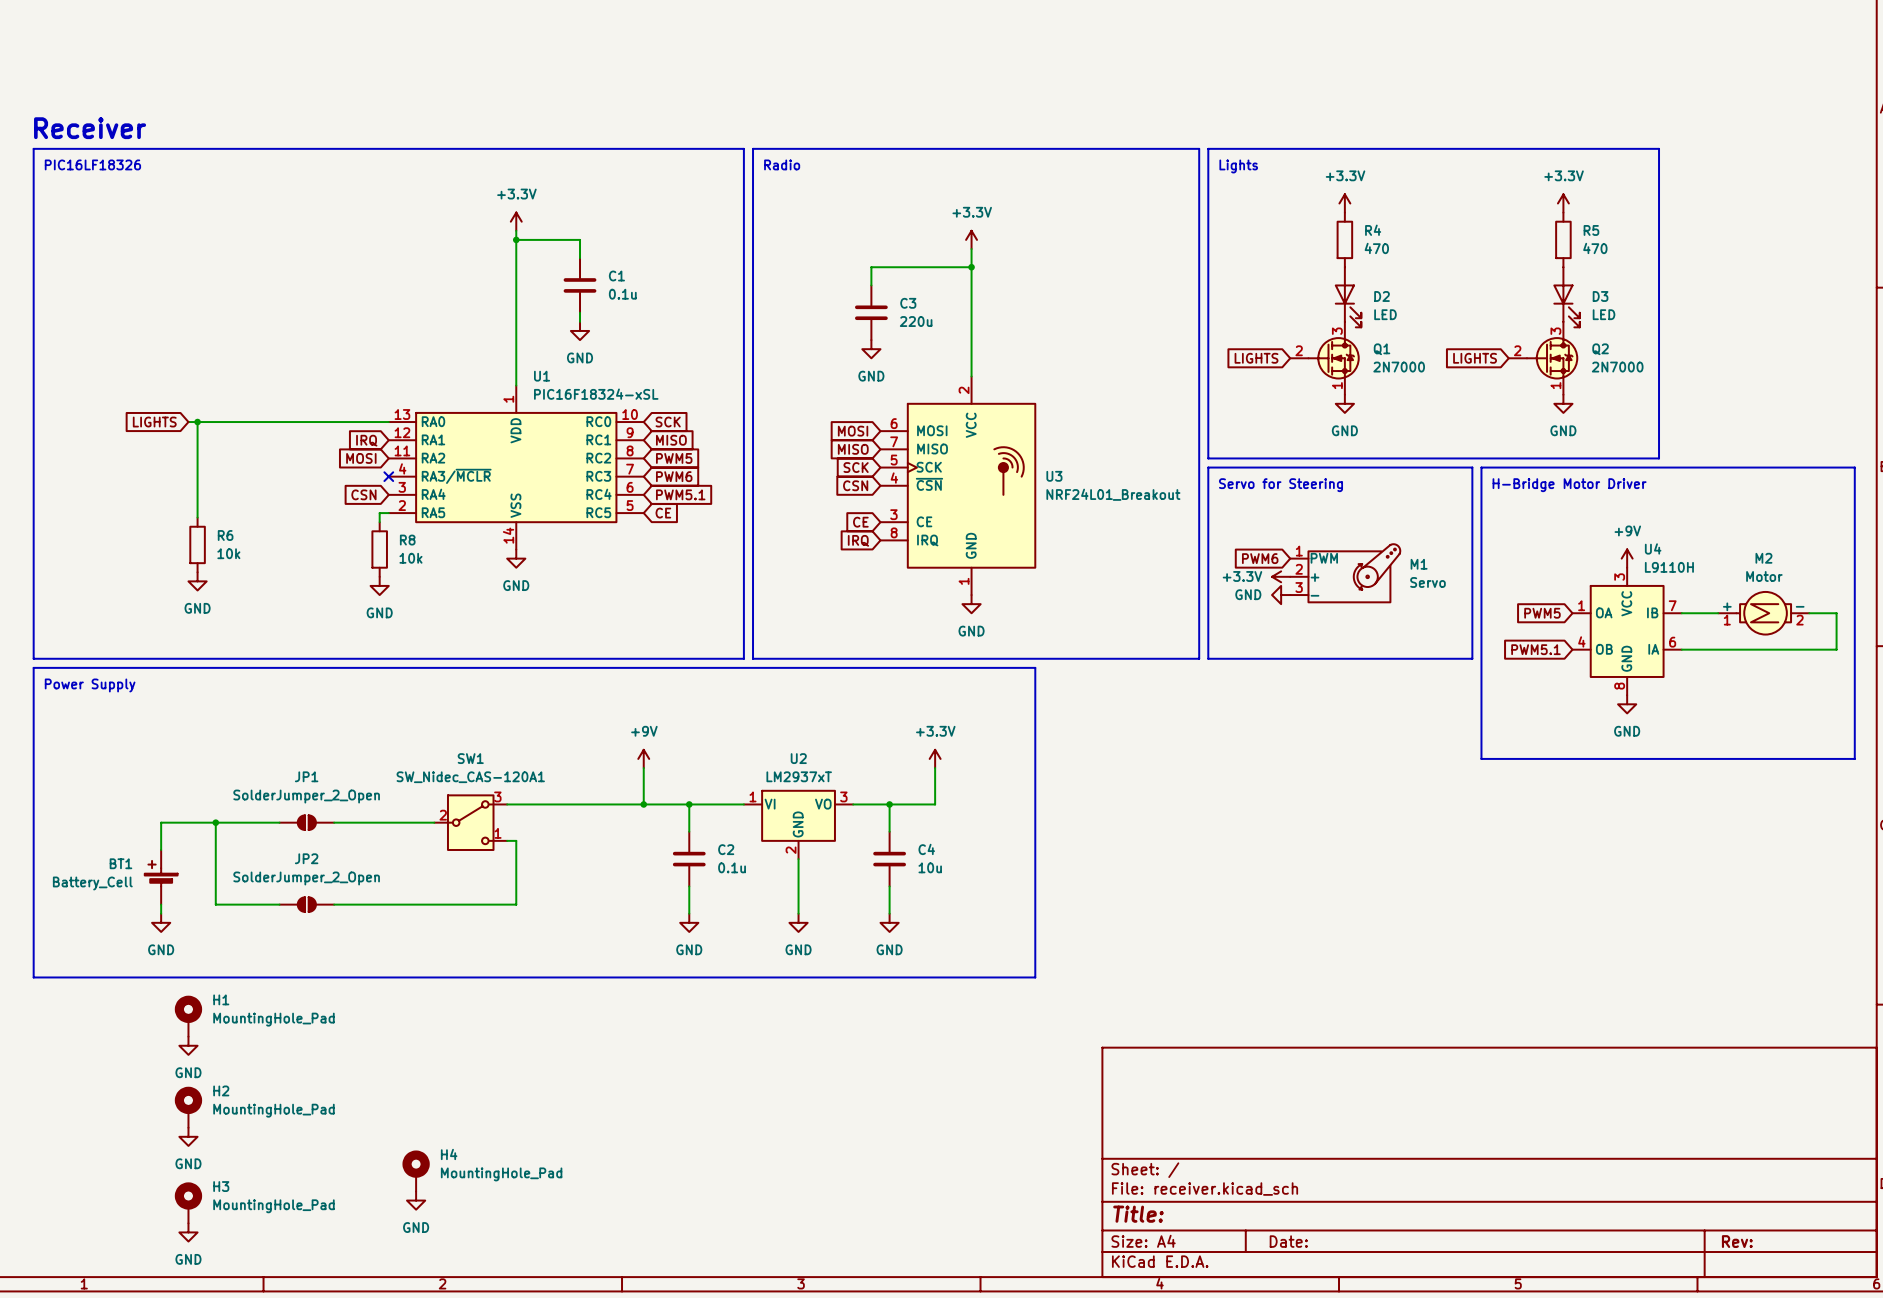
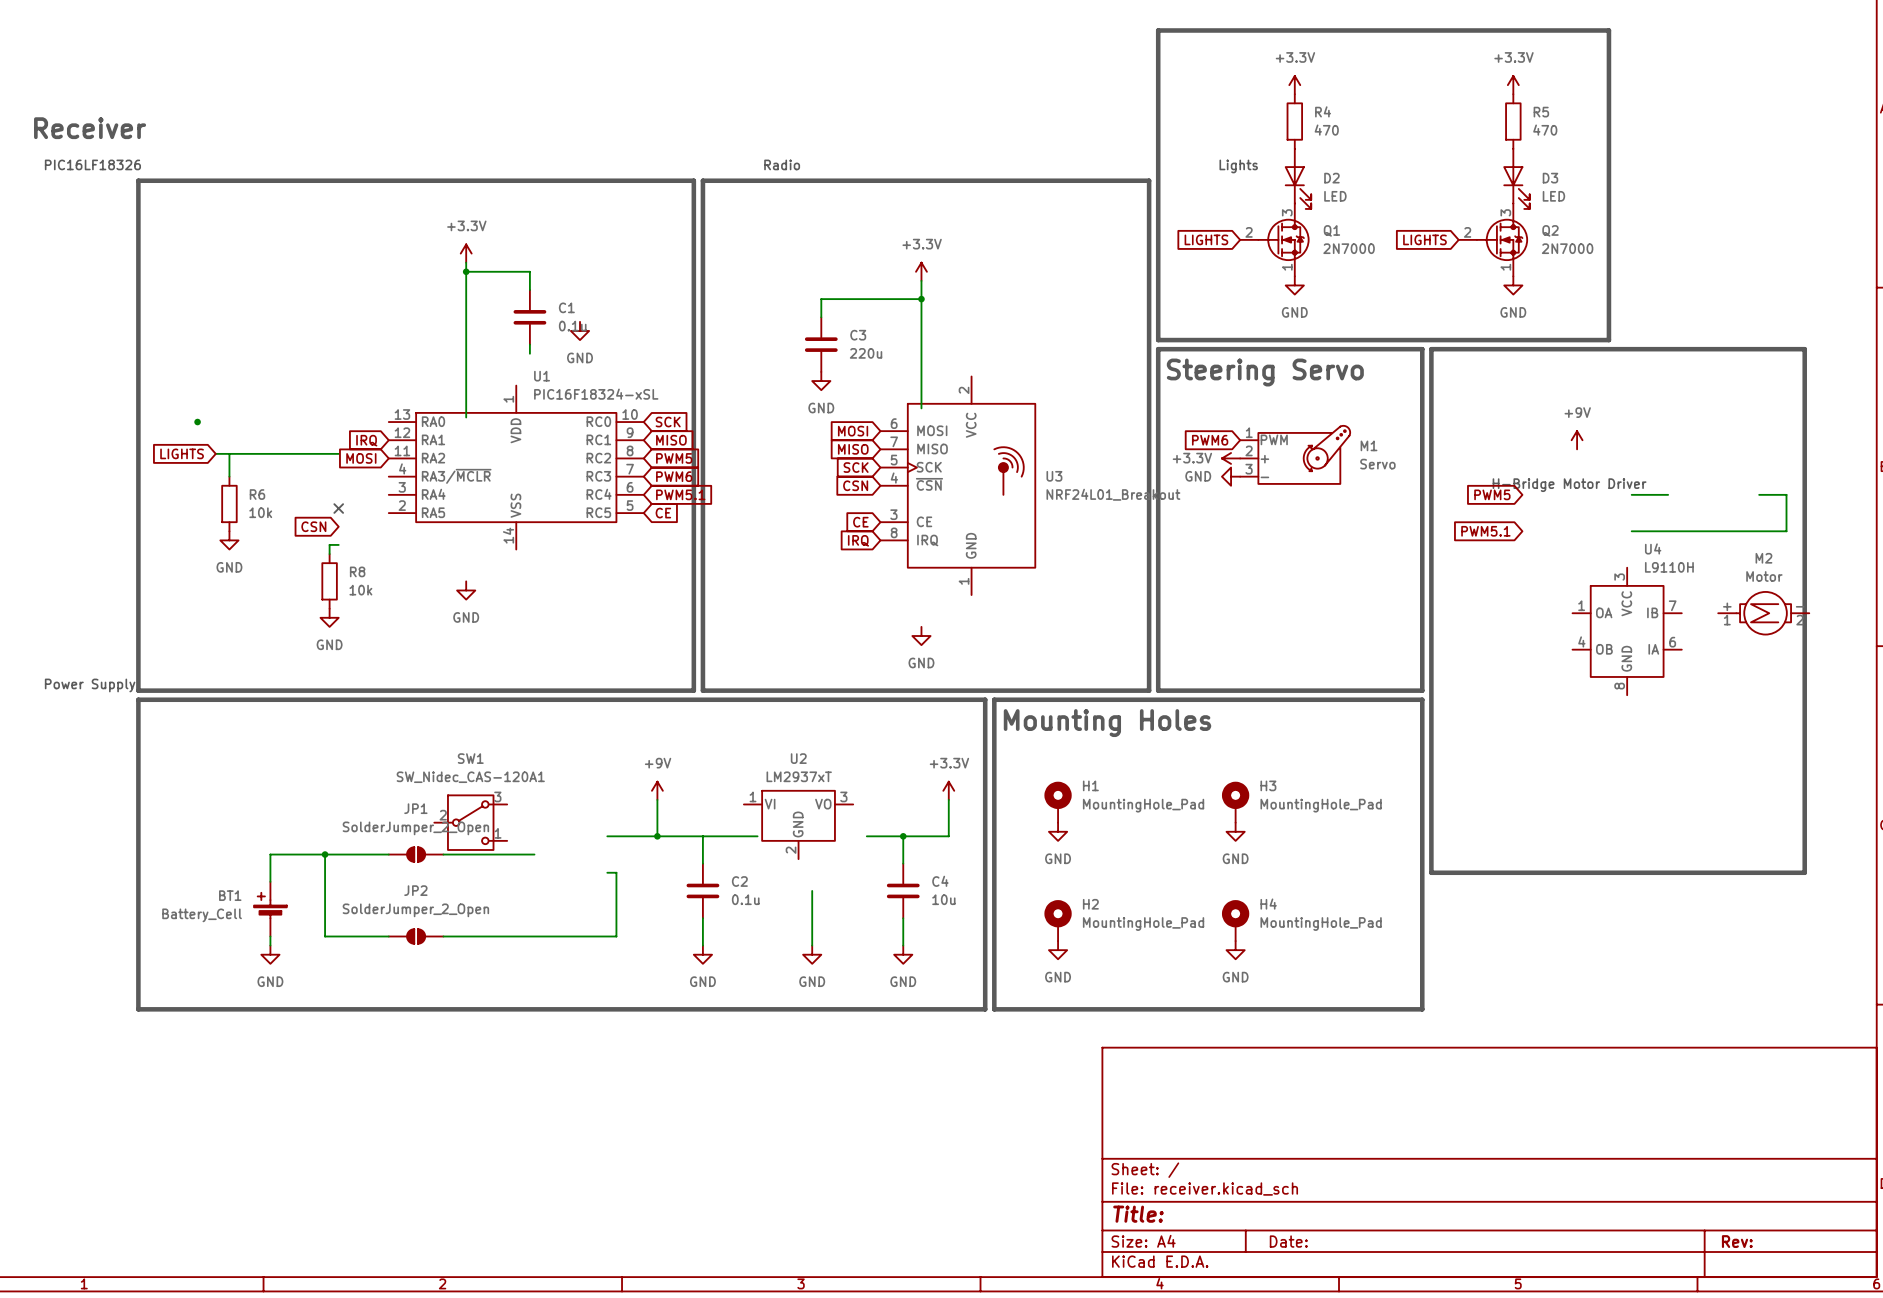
power symbol: none -> +3.3V (1294, 85)
power symbol: none -> +3.3V (1513, 85)
line: (33, 148) (743, 148) (743, 658) (33, 658) (33, 148) -> (138, 180) (138, 690) (693, 690) (693, 180) (138, 180)
line: (753, 148) (1199, 148) (1199, 658) (753, 658) (753, 148) -> (702, 180) (1149, 180) (1149, 690) (702, 690) (702, 180)
line: (1208, 148) (1208, 458) (1659, 458) (1659, 148) (1208, 148) -> (1158, 30) (1158, 340) (1608, 340) (1608, 30) (1158, 30)
power symbol: +3.3V (1344, 203) -> none
power symbol: +3.3V (1563, 203) -> none
power symbol position: +3.3V (516, 221) -> +3.3V (466, 253)
wire: (516, 230) (516, 385) -> (466, 262) (466, 417)
wire: (516, 239) (580, 239) (580, 258) -> (466, 271) (529, 271) (529, 289)
junction: (516, 239) -> none
power symbol position: +3.3V (971, 239) -> +3.3V (921, 271)
global label: none -> LIGHTS (1206, 239)
R4 position: (1344, 239) -> (1294, 121)
global label: none -> LIGHTS (1424, 239)
R5 position: (1563, 239) -> (1513, 121)
wire: (971, 249) (971, 376) -> (921, 280) (921, 408)
wire: (971, 267) (871, 267) (871, 285) -> (921, 299) (821, 299) (821, 317)
junction: (971, 267) -> none
junction: none -> (466, 271)
C1 position: (580, 285) -> (529, 317)
power symbol: none -> GND (1294, 285)
power symbol: none -> GND (1513, 285)
D2 position: (1348, 297) -> (1297, 178)
D3 position: (1566, 297) -> (1516, 178)
junction: none -> (921, 299)
wire: (580, 312) (580, 321) -> (529, 344) (529, 353)
C3 position: (871, 312) -> (821, 344)
power symbol position: GND (871, 349) -> GND (821, 381)
line: none -> (1158, 349) (1422, 349) (1422, 690) (1158, 690) (1158, 349)
line: none -> (1431, 349) (1804, 349) (1804, 872) (1431, 872) (1431, 349)
global label: LIGHTS (1256, 358) -> none
Q1 position: (1324, 358) -> (1274, 239)
global label: LIGHTS (1475, 358) -> none
Q2 position: (1543, 358) -> (1493, 239)
text: none -> Steering Servo (1265, 372)
power symbol: GND (1344, 403) -> none
power symbol: GND (1563, 403) -> none
global label position: LIGHTS (154, 422) -> LIGHTS (182, 453)
wire: (188, 422) (388, 422) -> none
wire: (197, 422) (197, 517) -> none
wire: none -> (215, 453) (338, 453)
wire: none -> (229, 453) (229, 476)
line: (1208, 467) (1472, 467) (1472, 658) (1208, 658) (1208, 467) -> none
line: (1481, 467) (1854, 467) (1854, 758) (1481, 758) (1481, 467) -> none
no-connect mark: (388, 476) -> none
power symbol: none -> GND (1231, 476)
text: Servo for Steering (1280, 485) -> none
global label position: CSN (363, 494) -> CSN (313, 526)
no-connect mark: none -> (338, 508)
wire: (388, 513) (379, 513) (379, 522) -> (338, 544) (329, 544) (329, 554)
R6 position: (197, 544) -> (229, 503)
R8 position: (379, 549) -> (329, 581)
power symbol: GND (516, 558) -> none
global label position: PWM6 (1260, 558) -> PWM6 (1210, 440)
power symbol position: +9V (1627, 558) -> +9V (1577, 440)
M1 position: (1345, 573) -> (1295, 455)
power symbol position: +3.3V (1281, 576) -> +3.3V (1231, 458)
power symbol position: GND (197, 581) -> GND (229, 540)
power symbol: GND (379, 585) -> none
power symbol: none -> GND (466, 590)
power symbol: GND (1281, 595) -> none
power symbol position: GND (971, 604) -> GND (921, 636)
global label position: PWM5 (1542, 613) -> PWM5 (1492, 494)
wire: (1681, 613) (1718, 613) -> (1631, 494) (1668, 494)
wire: (1809, 613) (1836, 613) (1836, 649) (1681, 649) -> (1759, 494) (1786, 494) (1786, 531) (1631, 531)
power symbol: none -> GND (329, 617)
global label position: PWM5.1 (1535, 649) -> PWM5.1 (1485, 531)
line: (33, 667) (33, 977) (1035, 977) (1035, 667) (33, 667) -> (138, 699) (138, 1009) (985, 1009) (985, 699) (138, 699)
line: none -> (994, 699) (1422, 699) (1422, 1009) (994, 1009) (994, 699)
power symbol: GND (1627, 704) -> none
text: none -> Mounting Holes (1107, 723)
power symbol position: +9V (643, 758) -> +9V (657, 790)
power symbol position: +3.3V (935, 758) -> +3.3V (948, 790)
wire: (643, 768) (643, 804) -> (657, 799) (657, 836)
wire: (935, 768) (935, 804) (853, 804) -> (948, 799) (948, 836) (866, 836)
wire: (507, 804) (743, 804) -> none
junction: (643, 804) -> none
wire: (689, 804) (689, 831) -> (702, 836) (702, 863)
junction: (689, 804) -> none
wire: (889, 804) (889, 831) -> (903, 836) (903, 863)
junction position: (889, 804) -> (903, 836)
wire: (215, 822) (215, 904) (279, 904) -> (325, 854) (325, 936) (388, 936)
junction: (215, 822) -> none
wire: (279, 822) (161, 822) (161, 849) -> (388, 854) (270, 854) (270, 881)
JP1 position: (306, 822) -> (416, 854)
wire: (334, 822) (434, 822) -> none
power symbol: none -> GND (1058, 831)
power symbol: none -> GND (1235, 831)
wire: none -> (607, 836) (757, 836)
junction: none -> (657, 836)
wire: (507, 840) (516, 840) (516, 904) (334, 904) -> none
junction: none -> (325, 854)
wire: none -> (443, 854) (534, 854)
C2 position: (689, 859) -> (702, 890)
wire: (798, 859) (798, 913) -> (812, 890) (812, 945)
C4 position: (889, 859) -> (903, 890)
wire: none -> (607, 872) (616, 872) (616, 936) (443, 936)
BT1 position: (161, 877) -> (270, 909)
wire: (689, 886) (689, 913) -> (702, 918) (702, 945)
wire: (889, 886) (889, 913) -> (903, 918) (903, 945)
wire: (161, 904) (161, 913) -> (270, 936) (270, 945)
JP2 position: (306, 904) -> (416, 936)
power symbol: GND (161, 922) -> none
power symbol position: GND (689, 922) -> GND (702, 954)
power symbol position: GND (798, 922) -> GND (812, 954)
power symbol position: GND (889, 922) -> GND (903, 954)
power symbol: none -> GND (1058, 950)
power symbol: none -> GND (1235, 950)
power symbol: none -> GND (270, 954)
H1 position: (188, 1016) -> (1058, 802)
power symbol: GND (188, 1045) -> none
H2 position: (188, 1107) -> (1058, 920)
power symbol: GND (188, 1136) -> none
H4 position: (416, 1170) -> (1235, 920)
power symbol: GND (416, 1200) -> none
H3 position: (188, 1202) -> (1235, 802)
power symbol: GND (188, 1232) -> none

